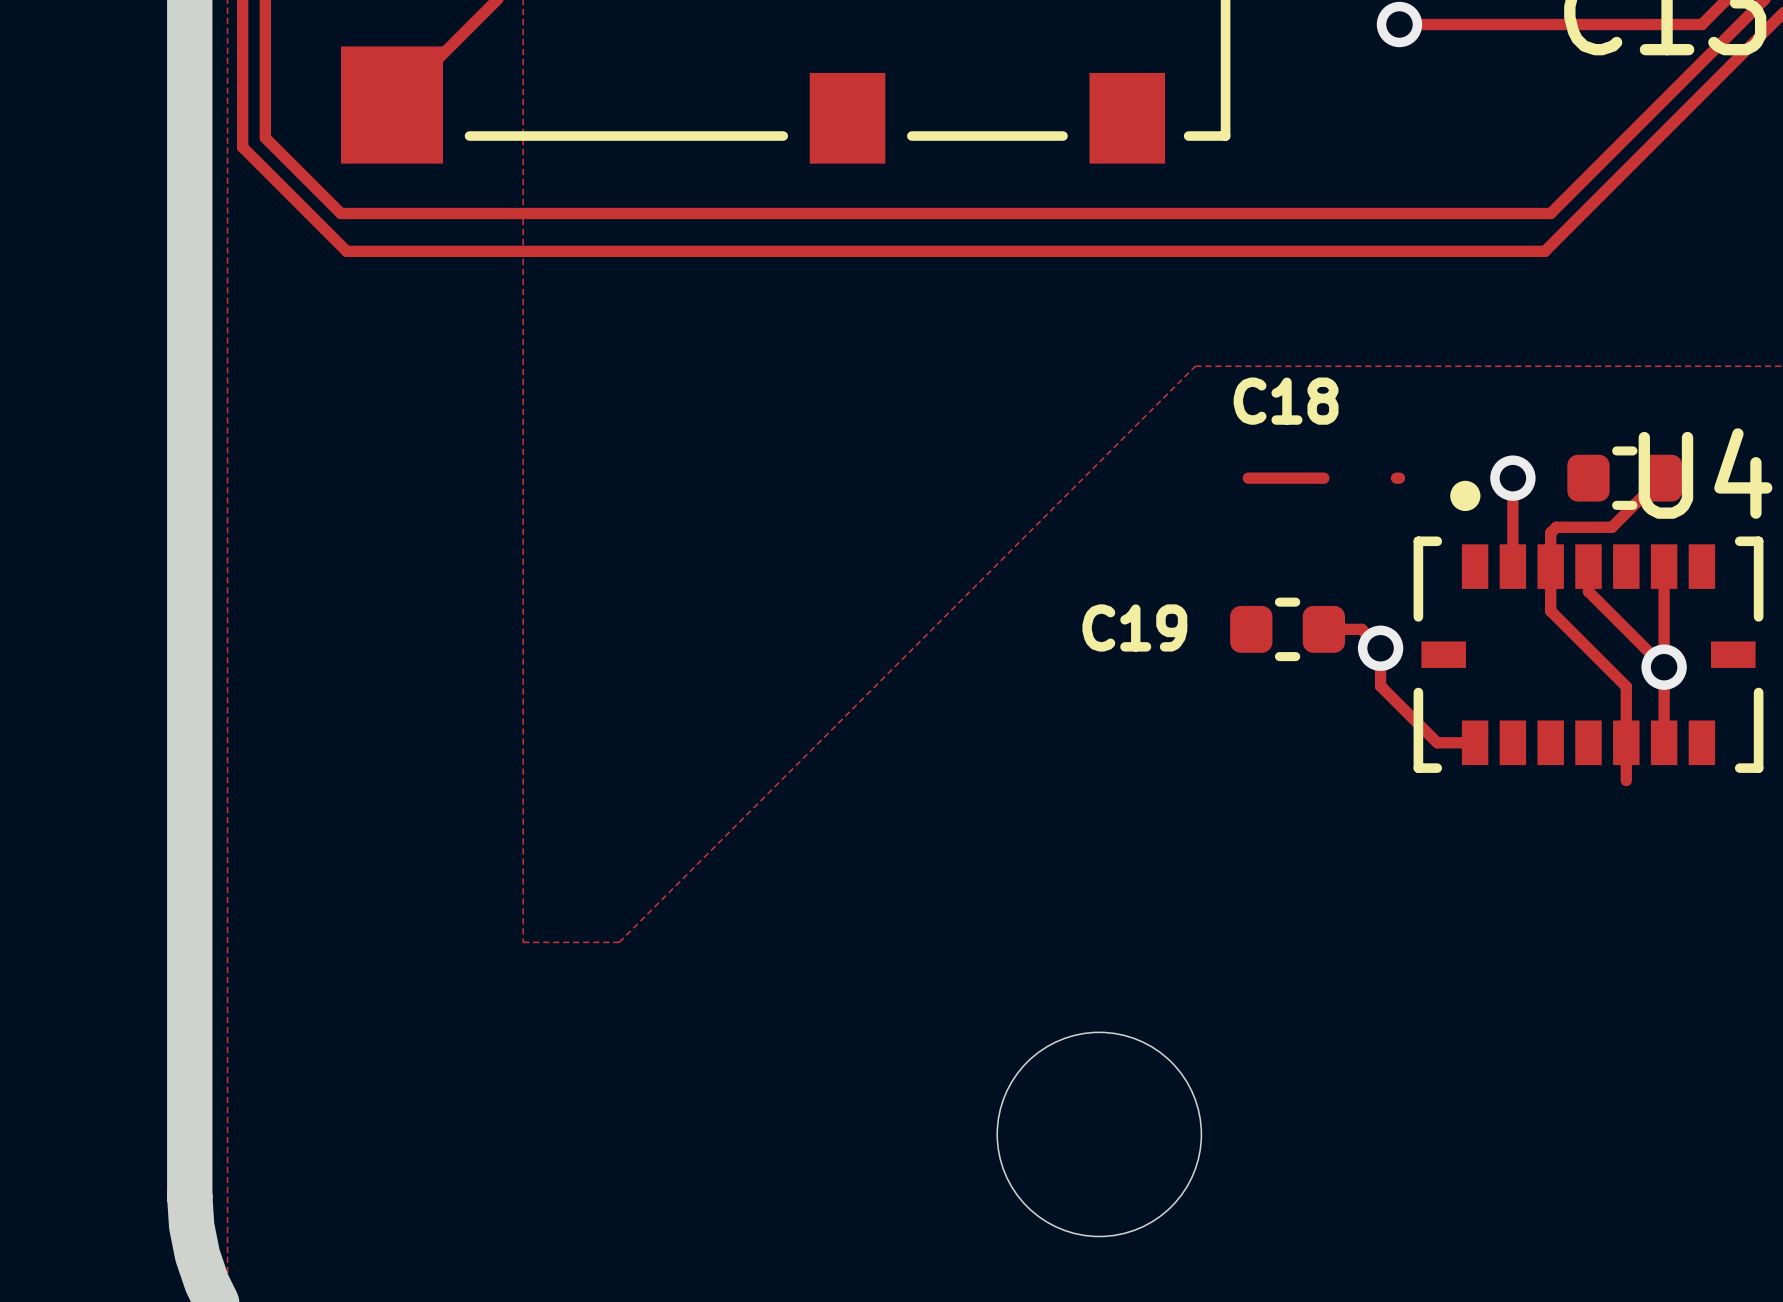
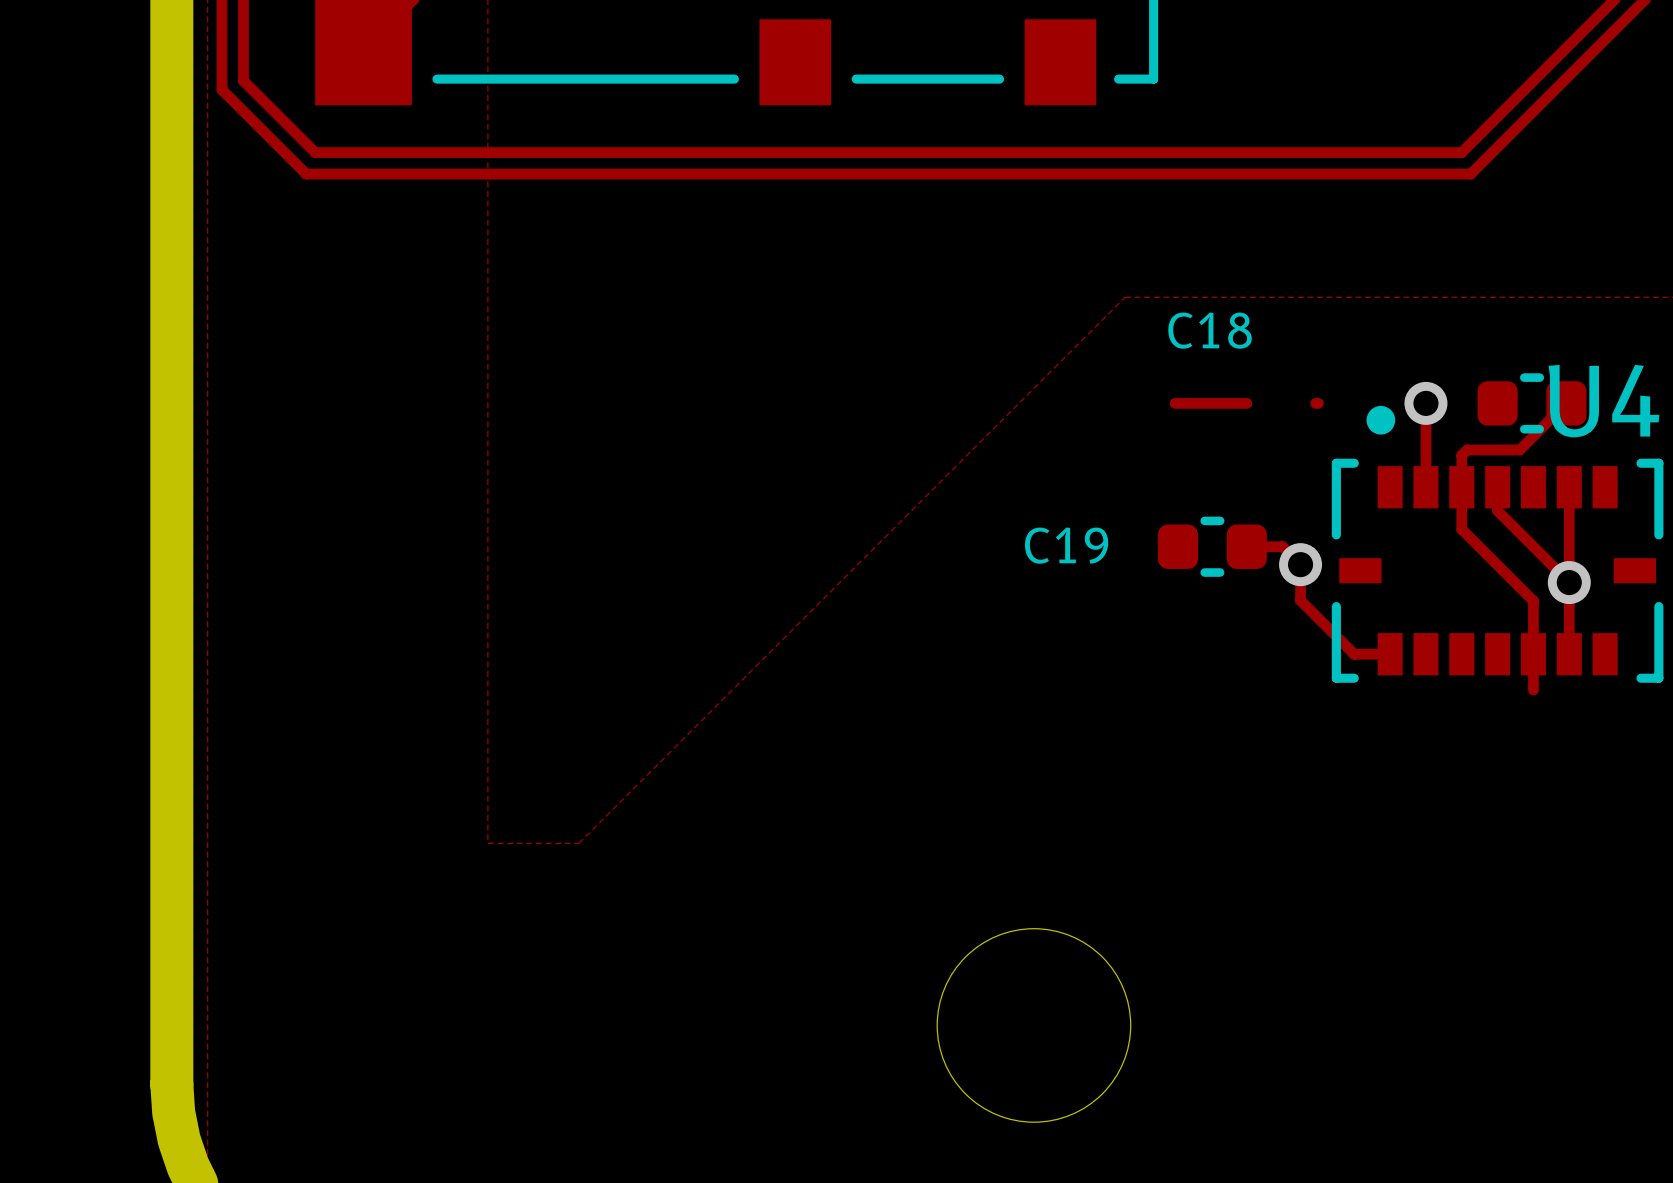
track: (331, 236) (346, 251) (1544, 251) (1560, 236) -> (306, 174) (1470, 174)

